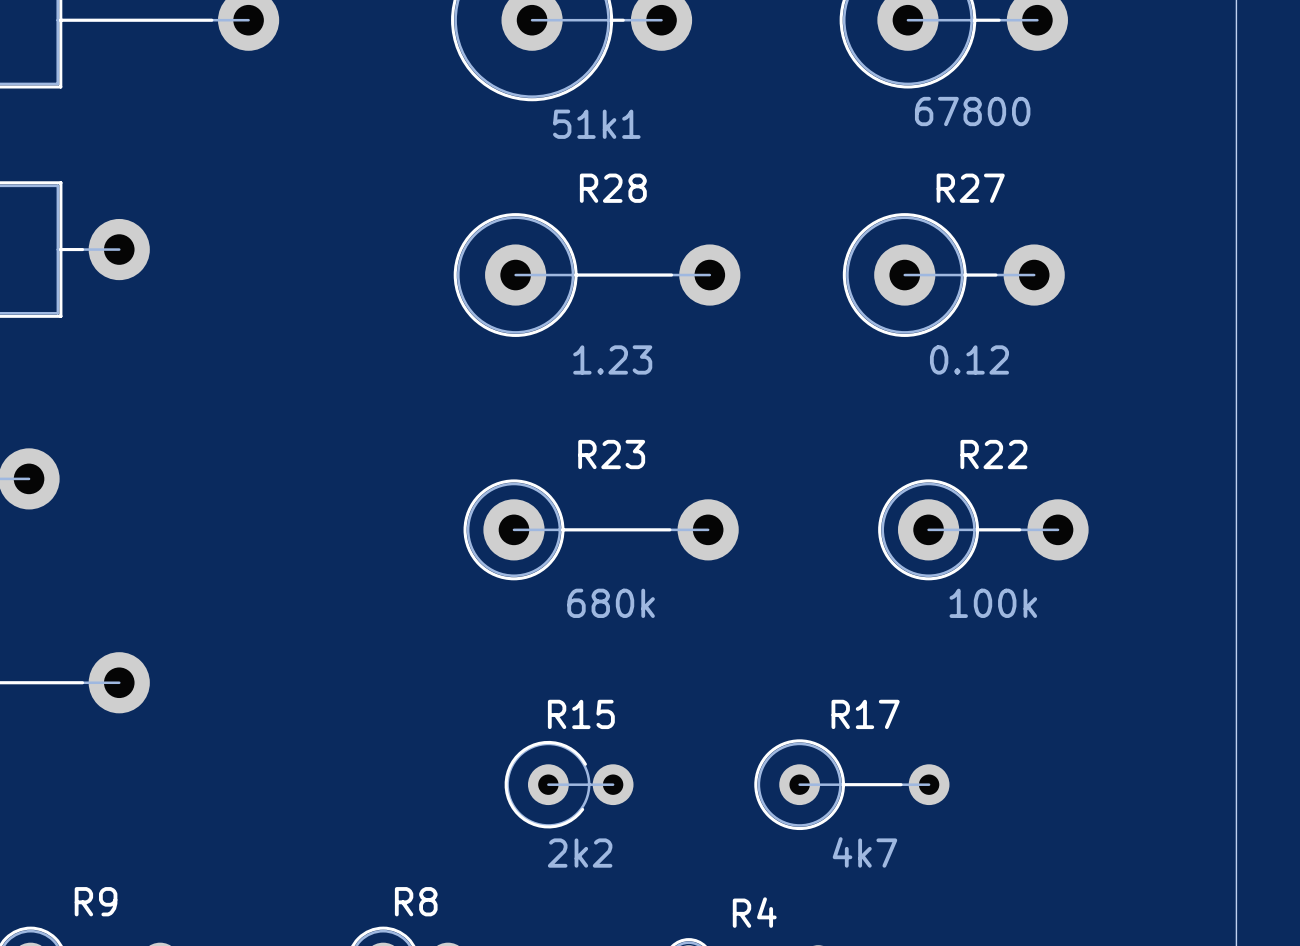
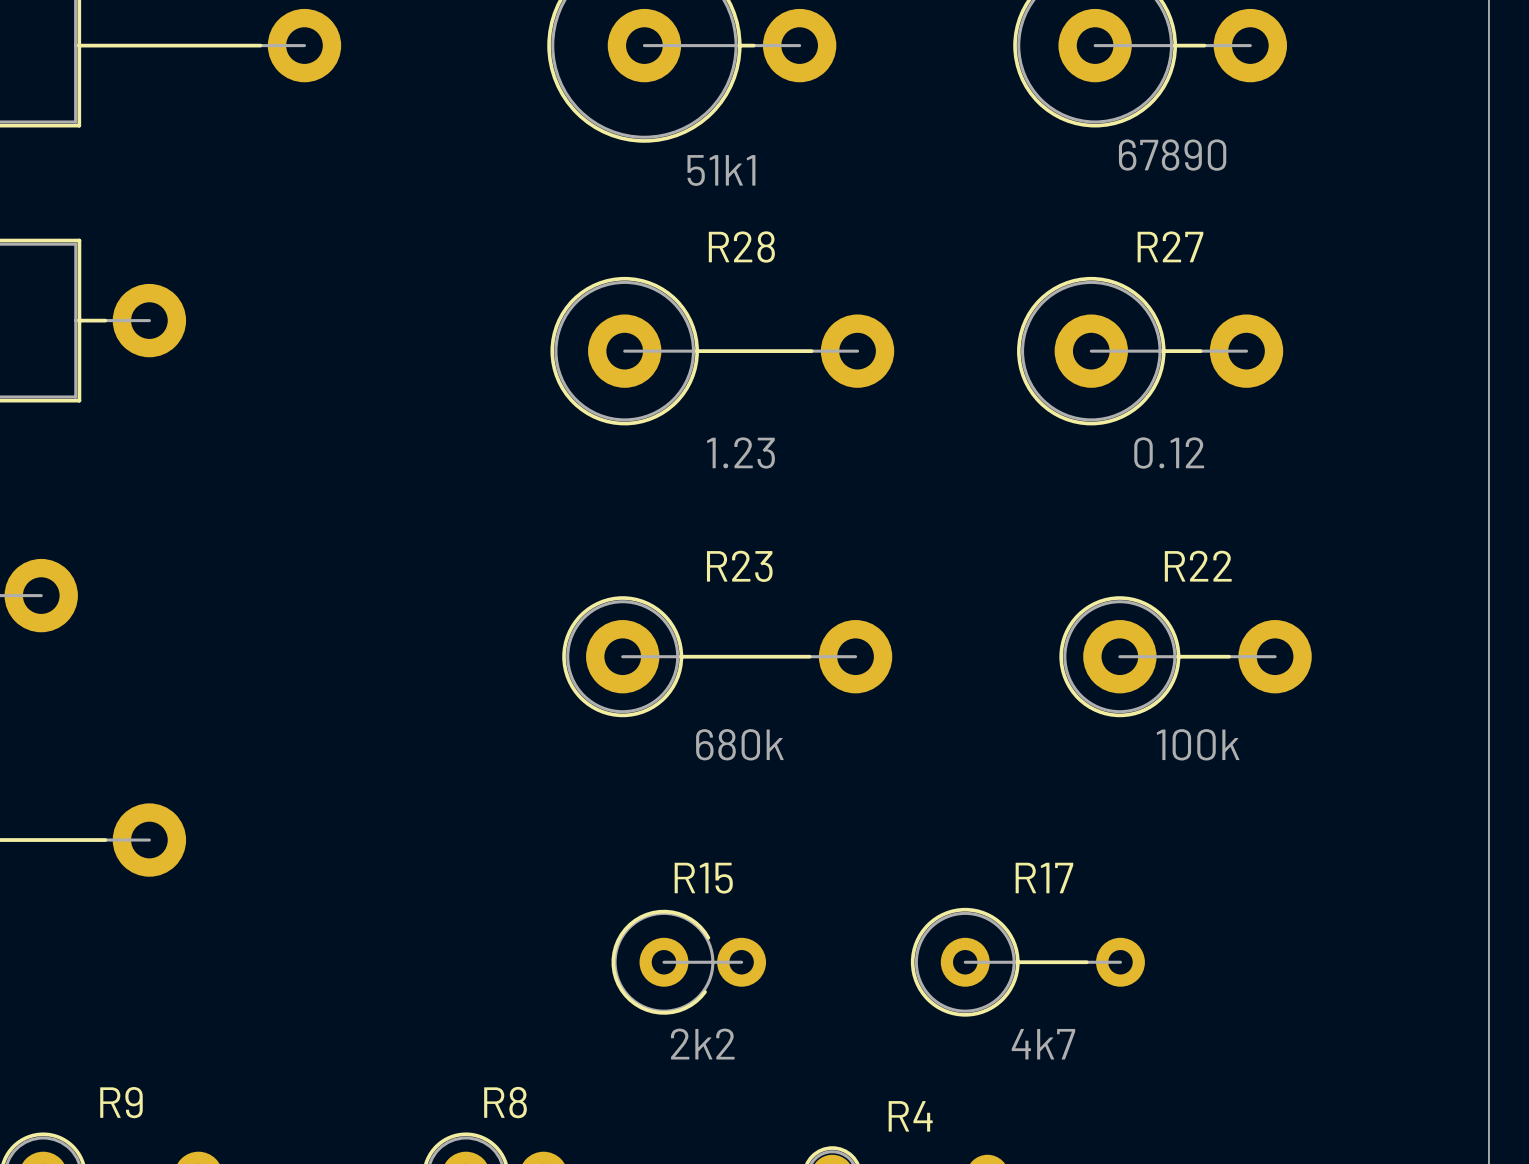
part value: 67800 (972, 111) -> 67890 (1172, 155)

